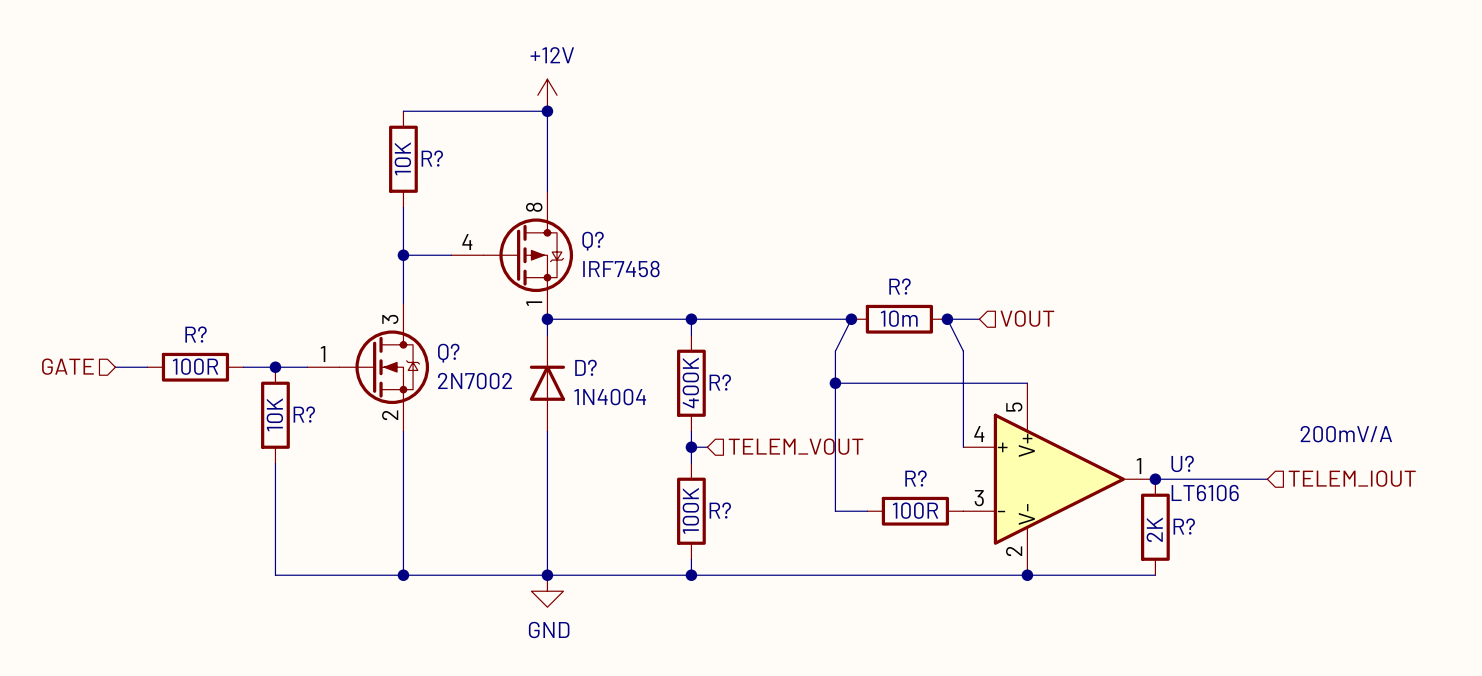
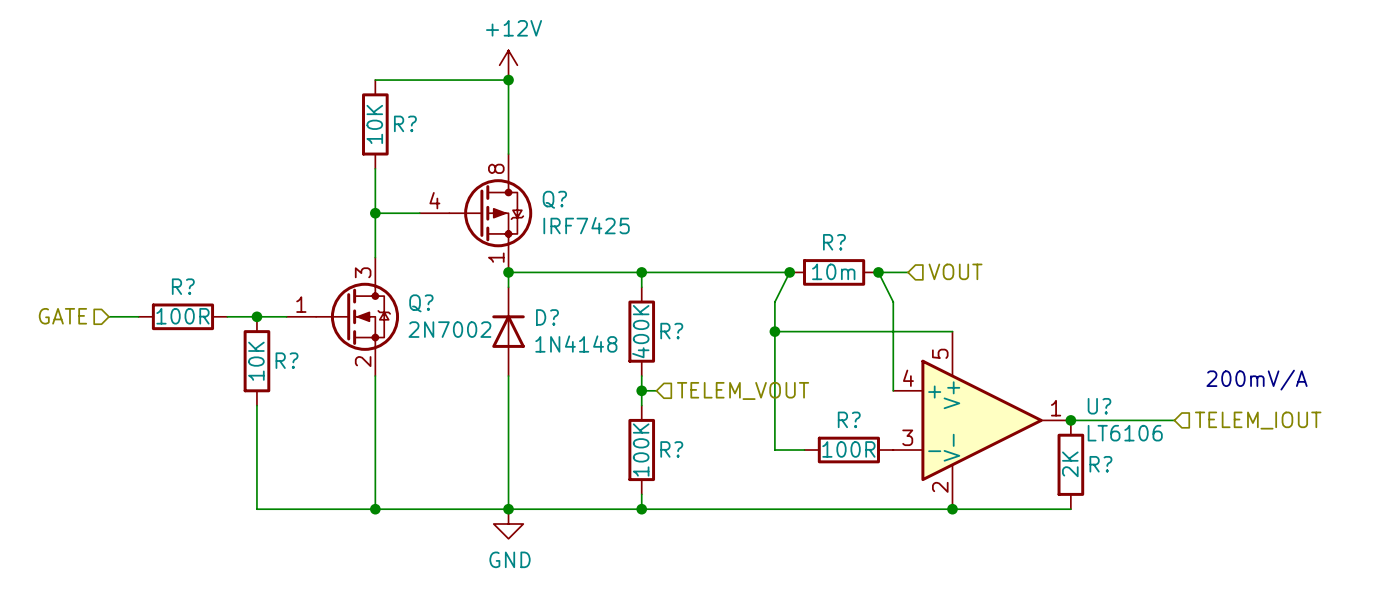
Q? value: IRF7458 (621, 269) -> IRF7425 (586, 225)
D? value: 1N4004 (610, 397) -> 1N4148 (576, 344)

